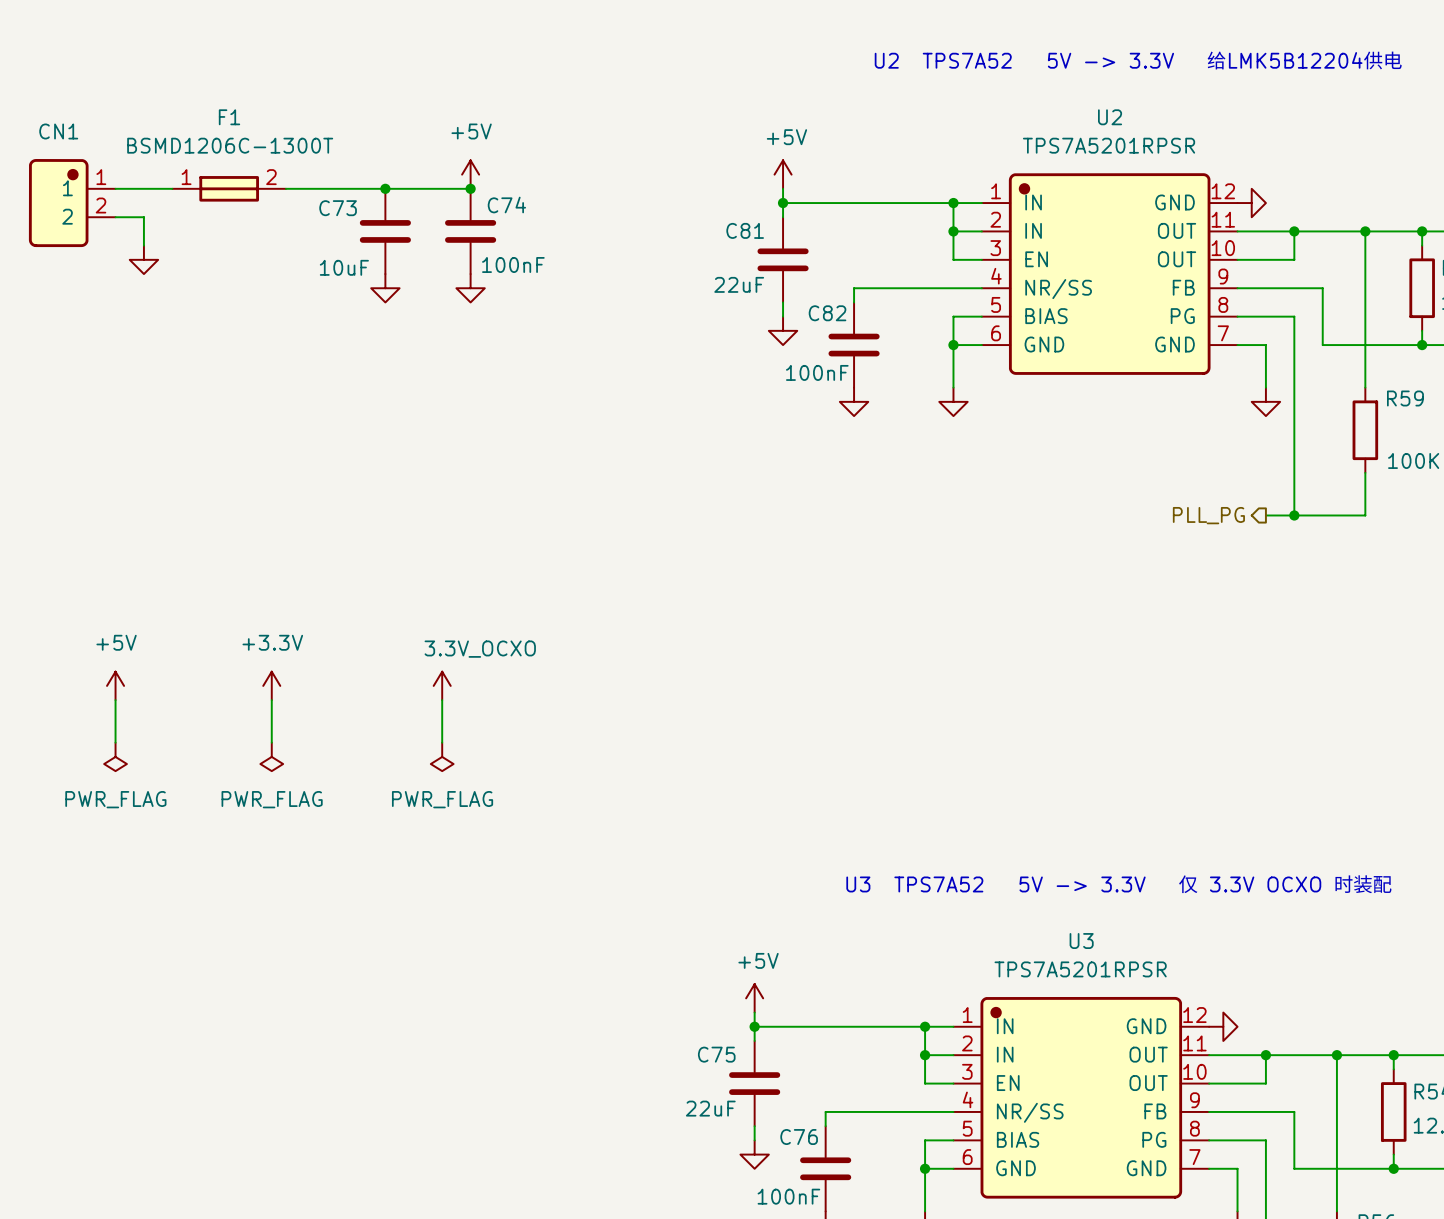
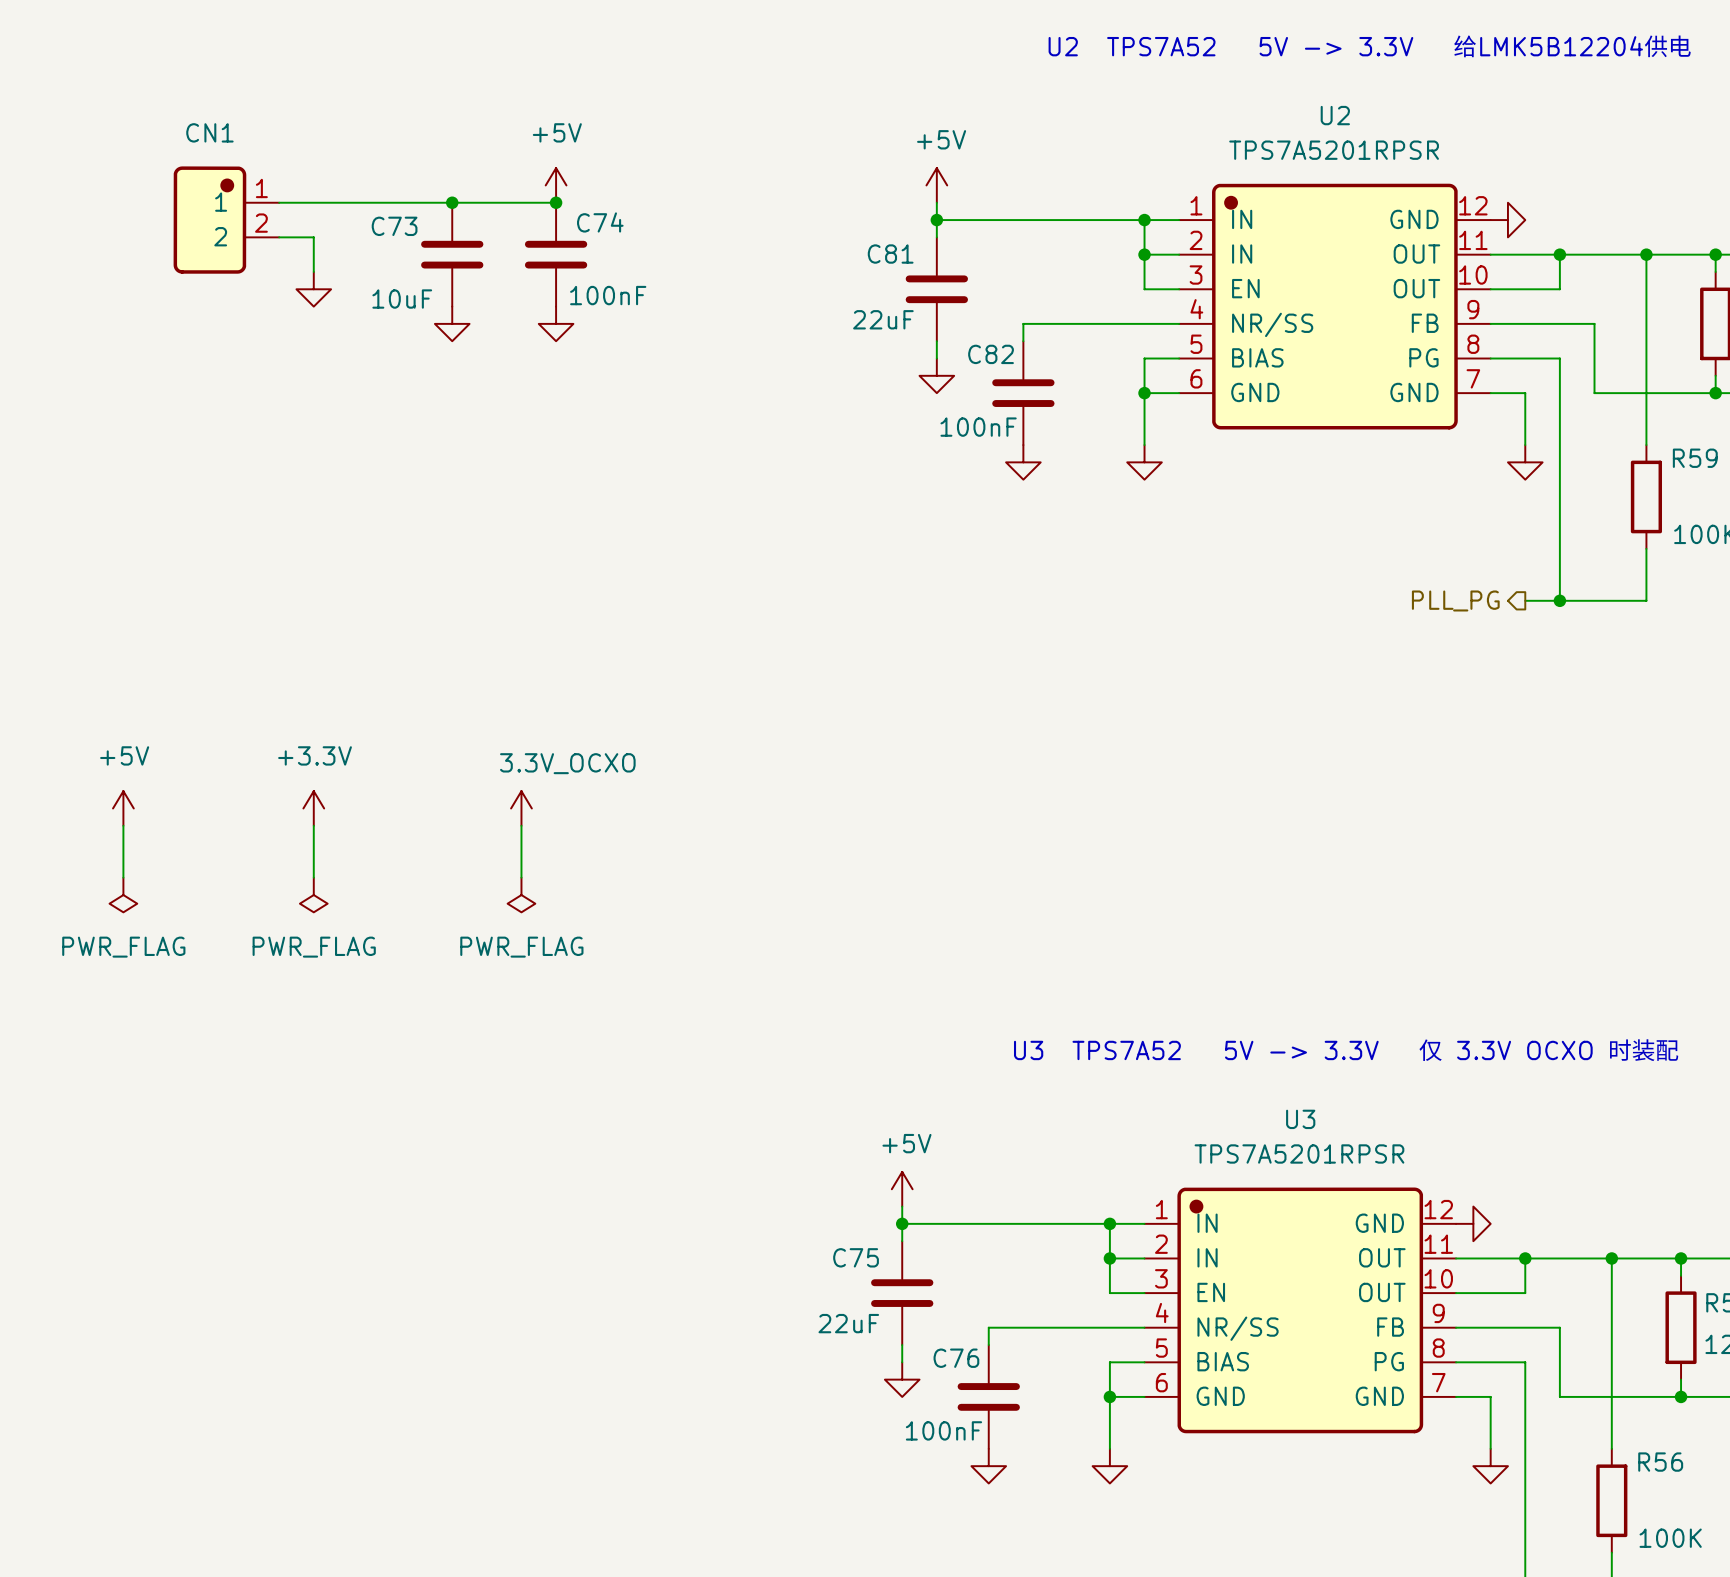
wire: (115, 188) (172, 188) -> none
F1: BSMD1206C-1300T (229, 188) -> none
CN1 position: (72, 203) -> (226, 220)
wire: (115, 217) (143, 217) (143, 245) -> (279, 237) (313, 237) (313, 271)
power symbol position: (143, 259) -> (313, 289)

